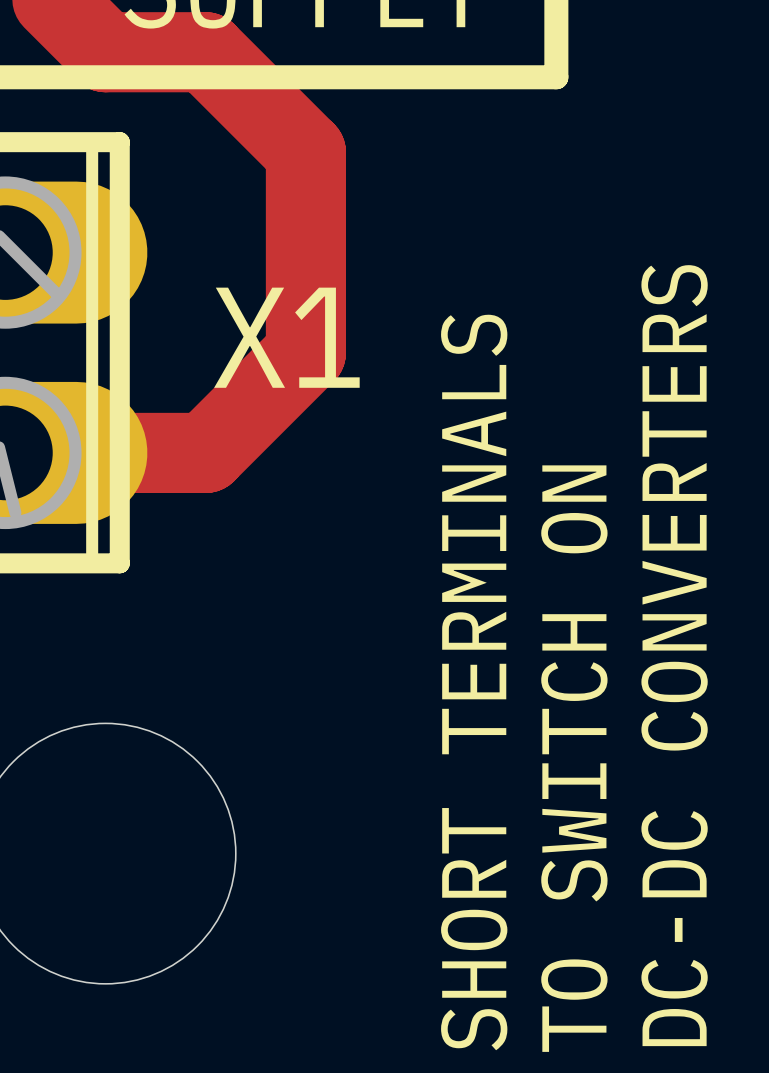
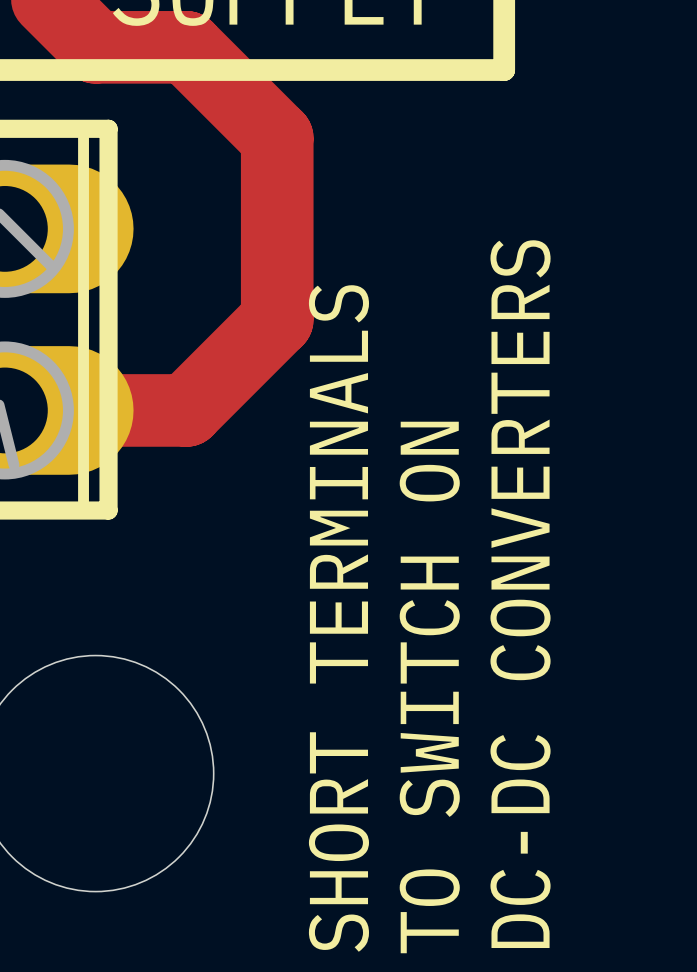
X1 name: X1 (286, 337) -> none
text: DC-DC CONVERTERS (674, 655) -> none
text: none -> SHORT TERMINALS (338, 618)
text: SHORT TERMINALS (474, 682) -> TO SWITCH ON (429, 687)
text: TO SWITCH ON (574, 758) -> DC-DC CONVERTERS (520, 594)

